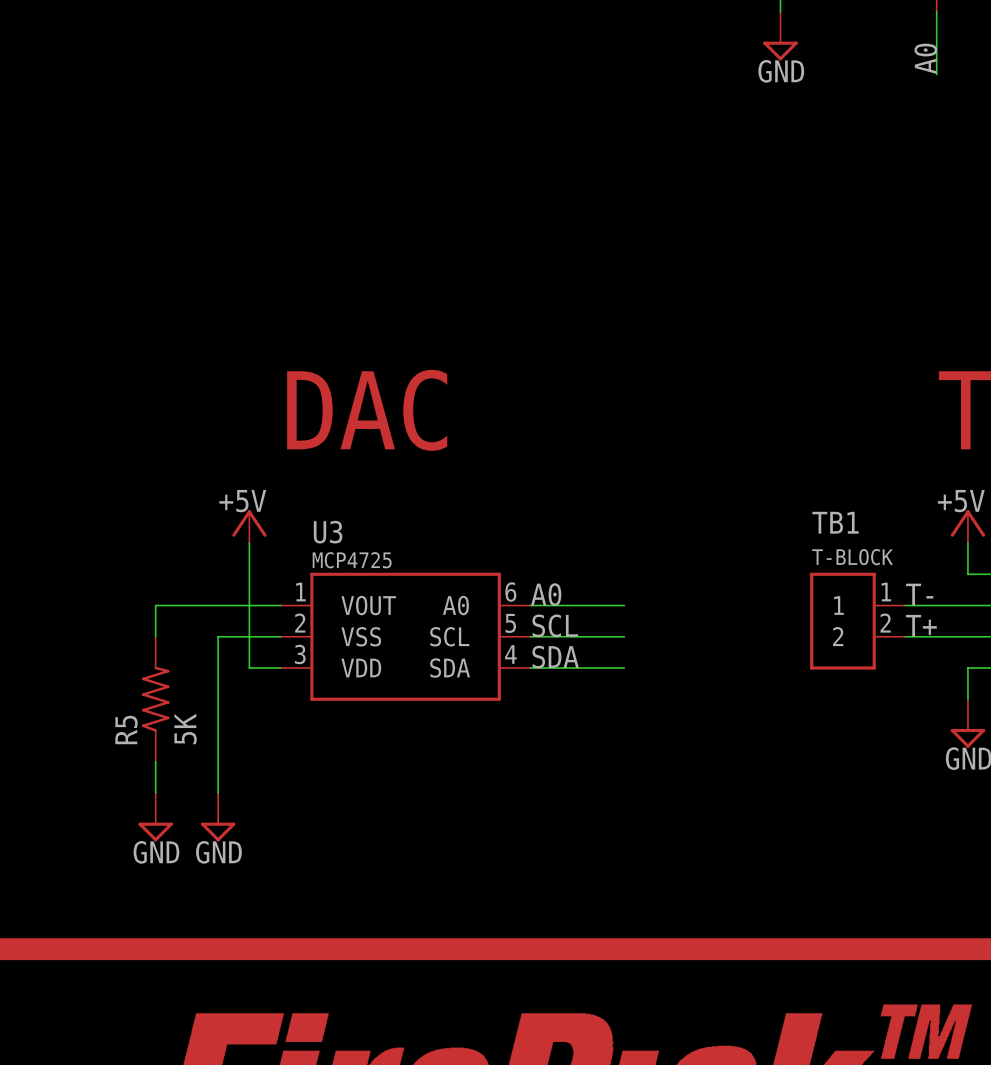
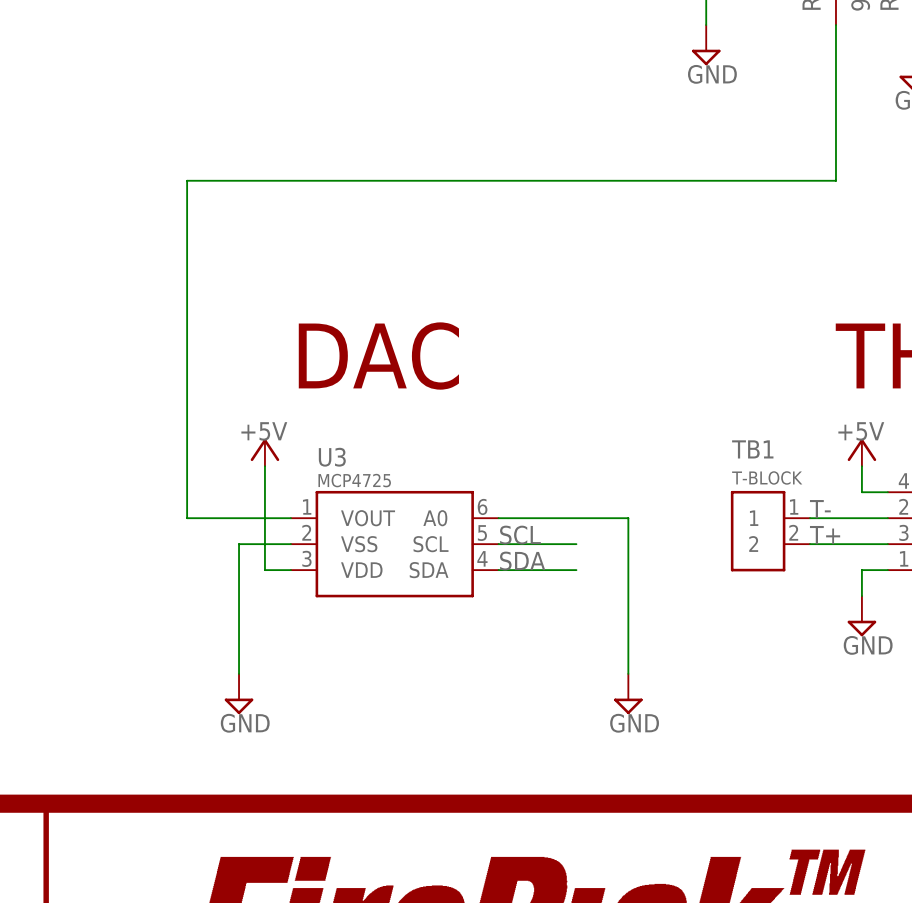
label: A0 (925, 58) -> none
label: A0 (546, 594) -> none
wire: (155, 605) (155, 636) -> (187, 518) (187, 180) (835, 180) (835, 76)
wire: none -> (576, 518) (628, 518) (628, 673)
R5: 5K (155, 699) -> none
wire: (155, 761) (155, 792) -> none
power symbol: GND (155, 817) -> none
power symbol: none -> GND (628, 694)

